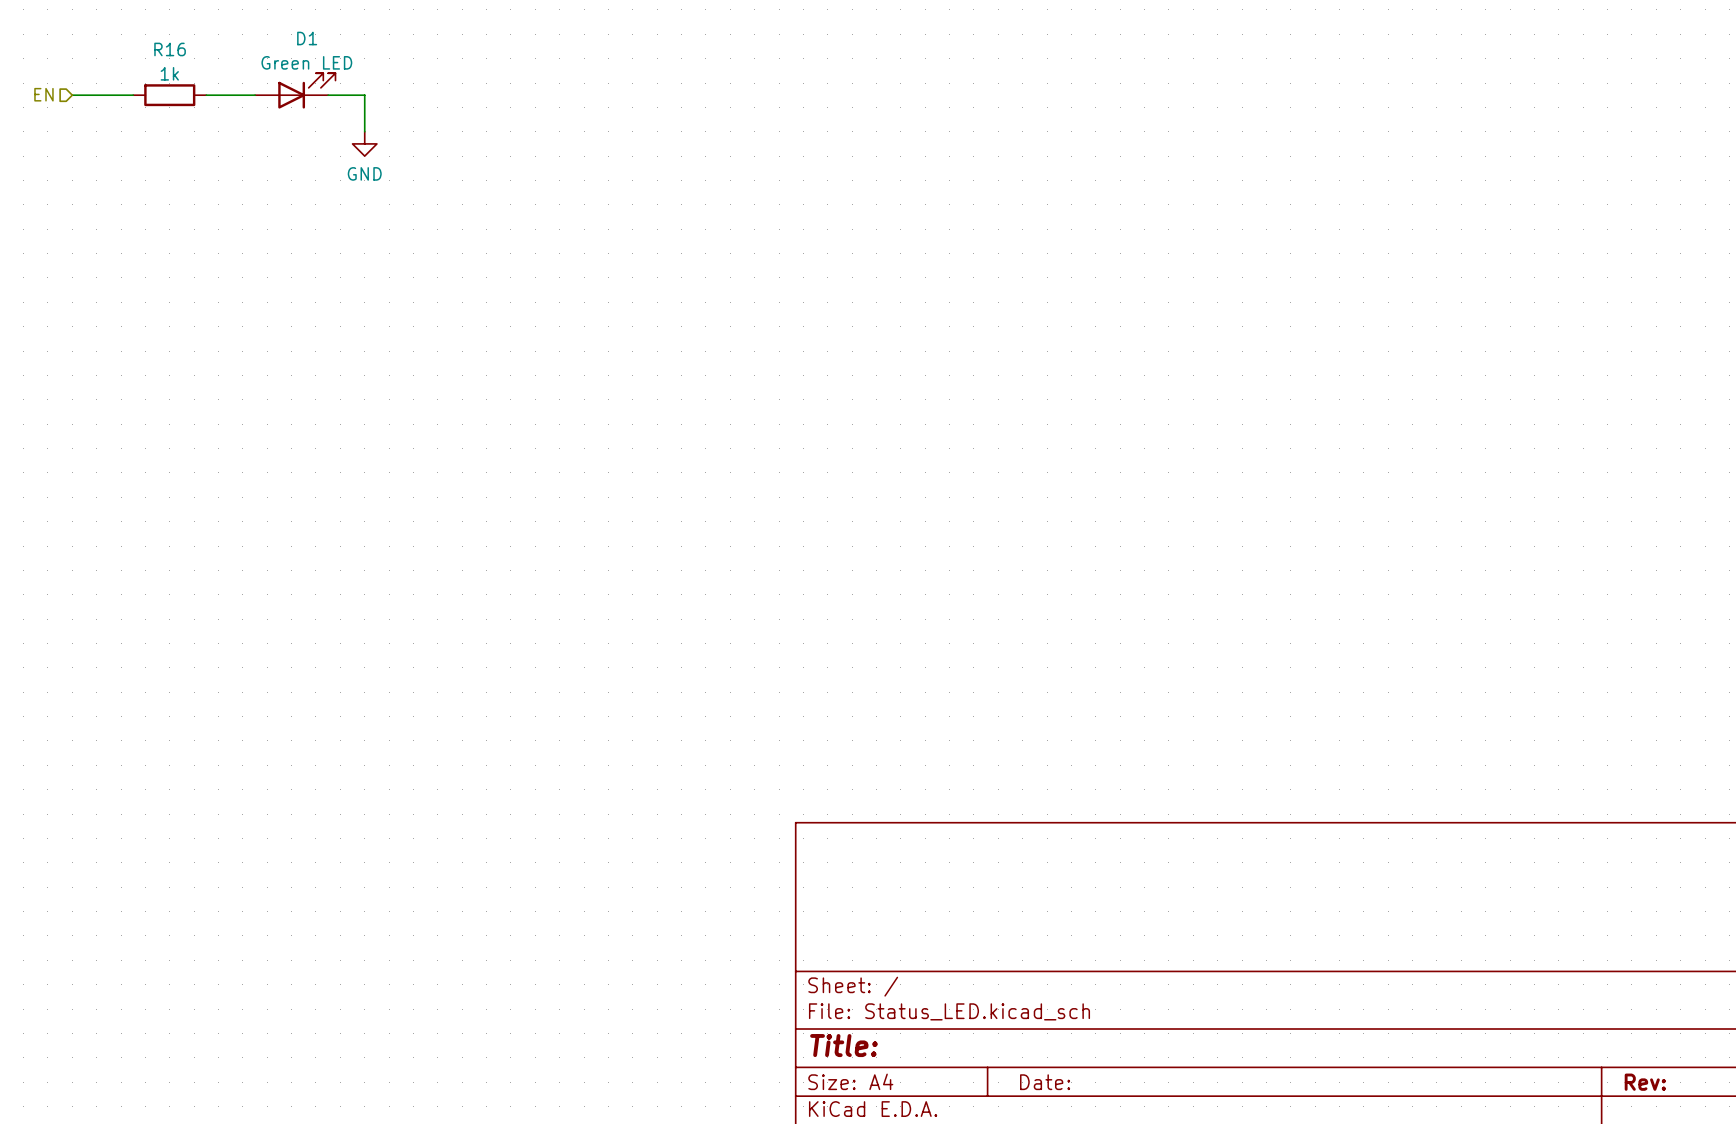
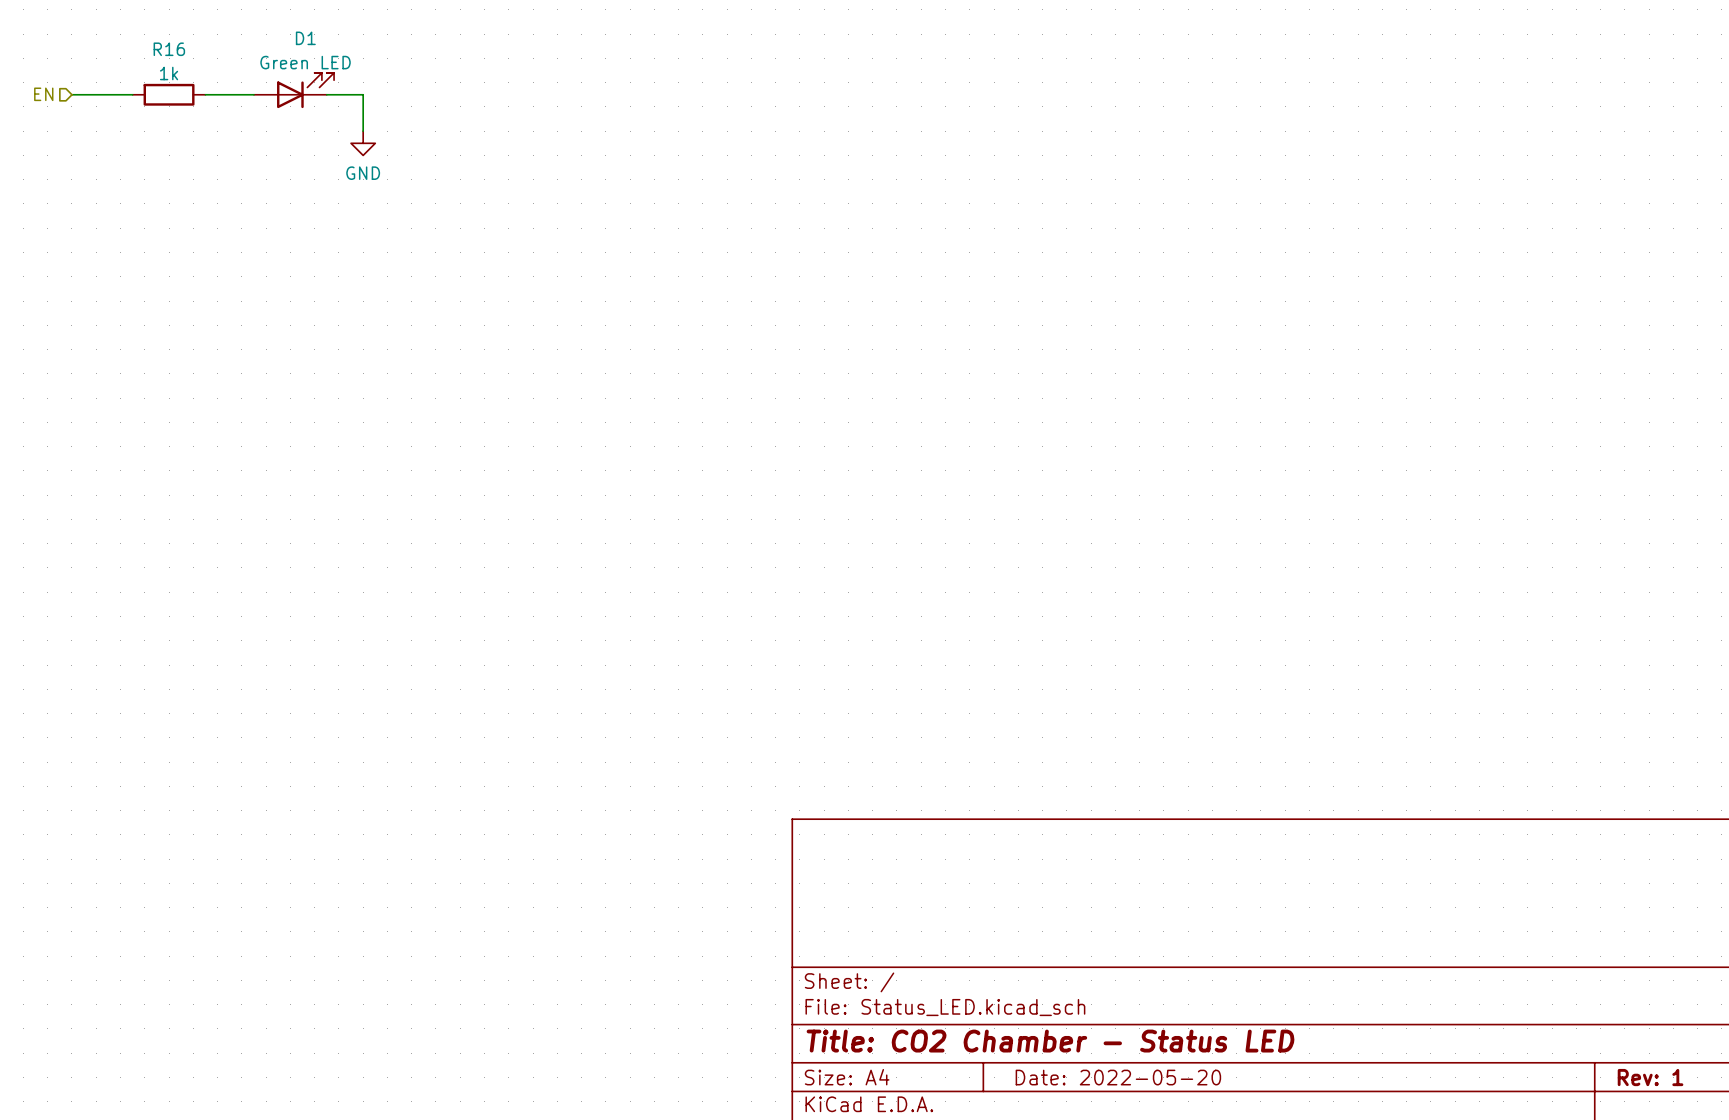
title block: Title: (843, 1045) -> Title: CO2 Chamber - Status LED (1050, 1041)
title block: Date: (1045, 1082) -> Date: 2022-05-20 (1118, 1077)
title block: Rev: (1645, 1082) -> Rev: 1 (1650, 1077)

